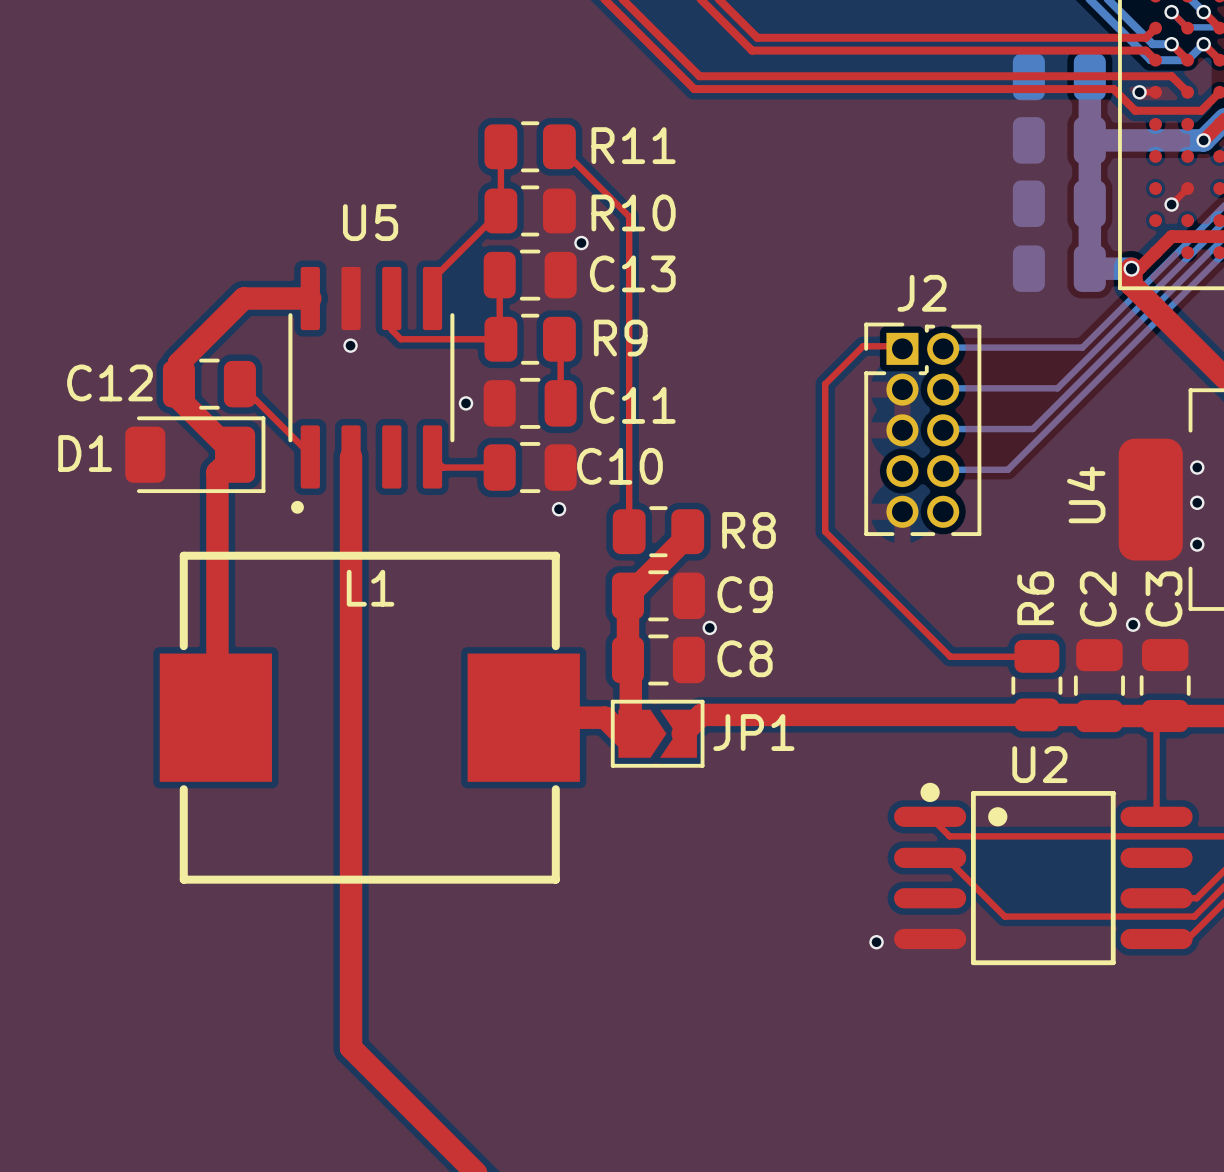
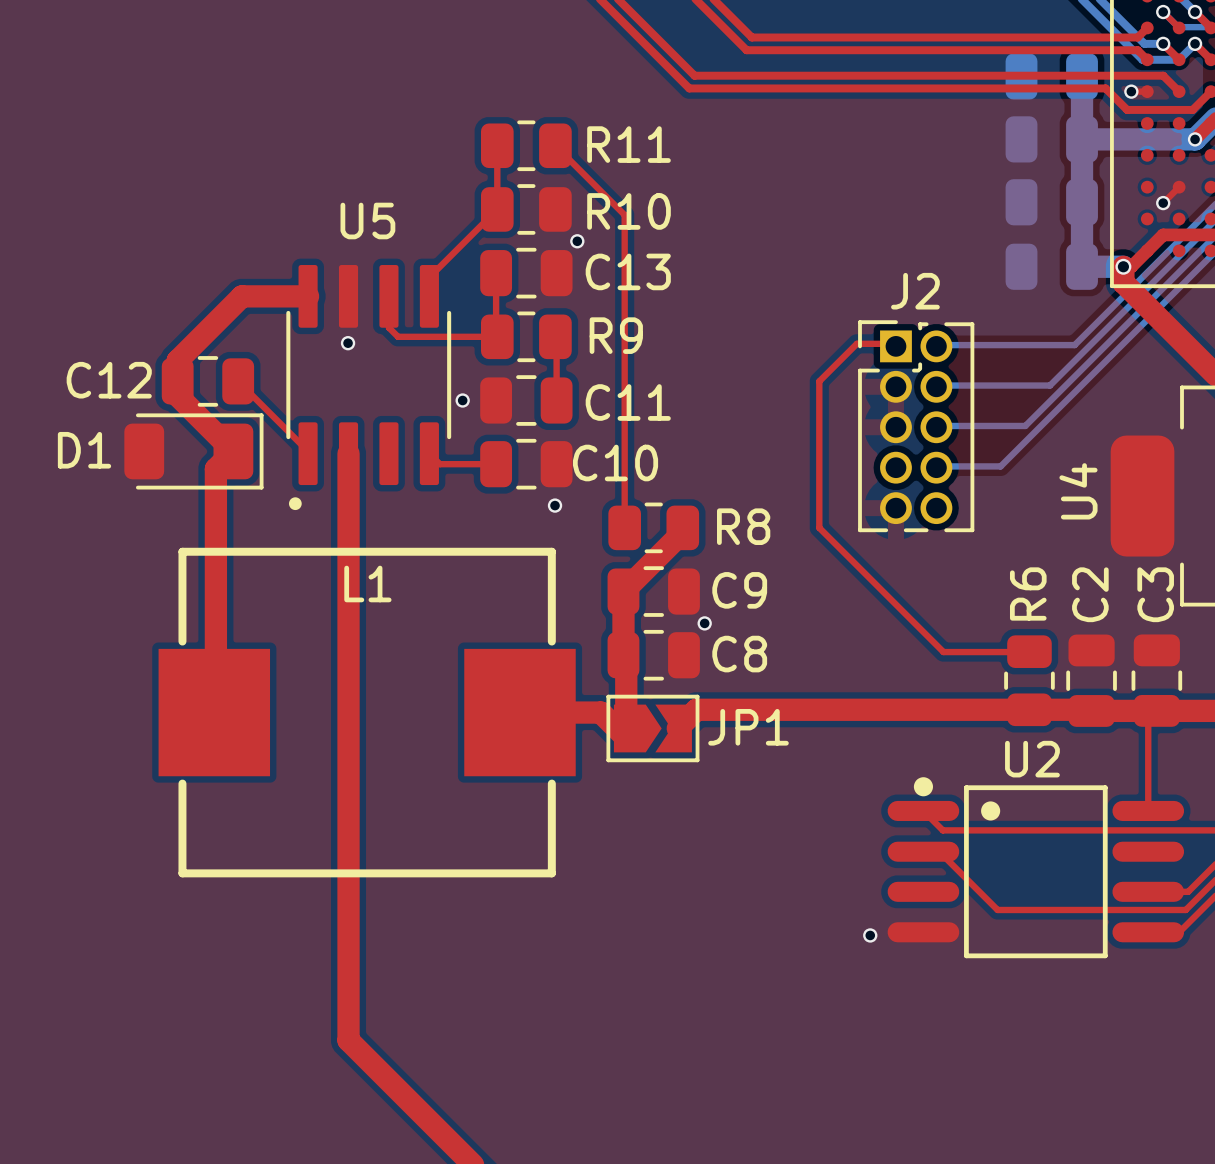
via: (1197, 467) -> none
via: (1197, 502) -> none
via: (1197, 544) -> none
via: (1133, 624) -> none

